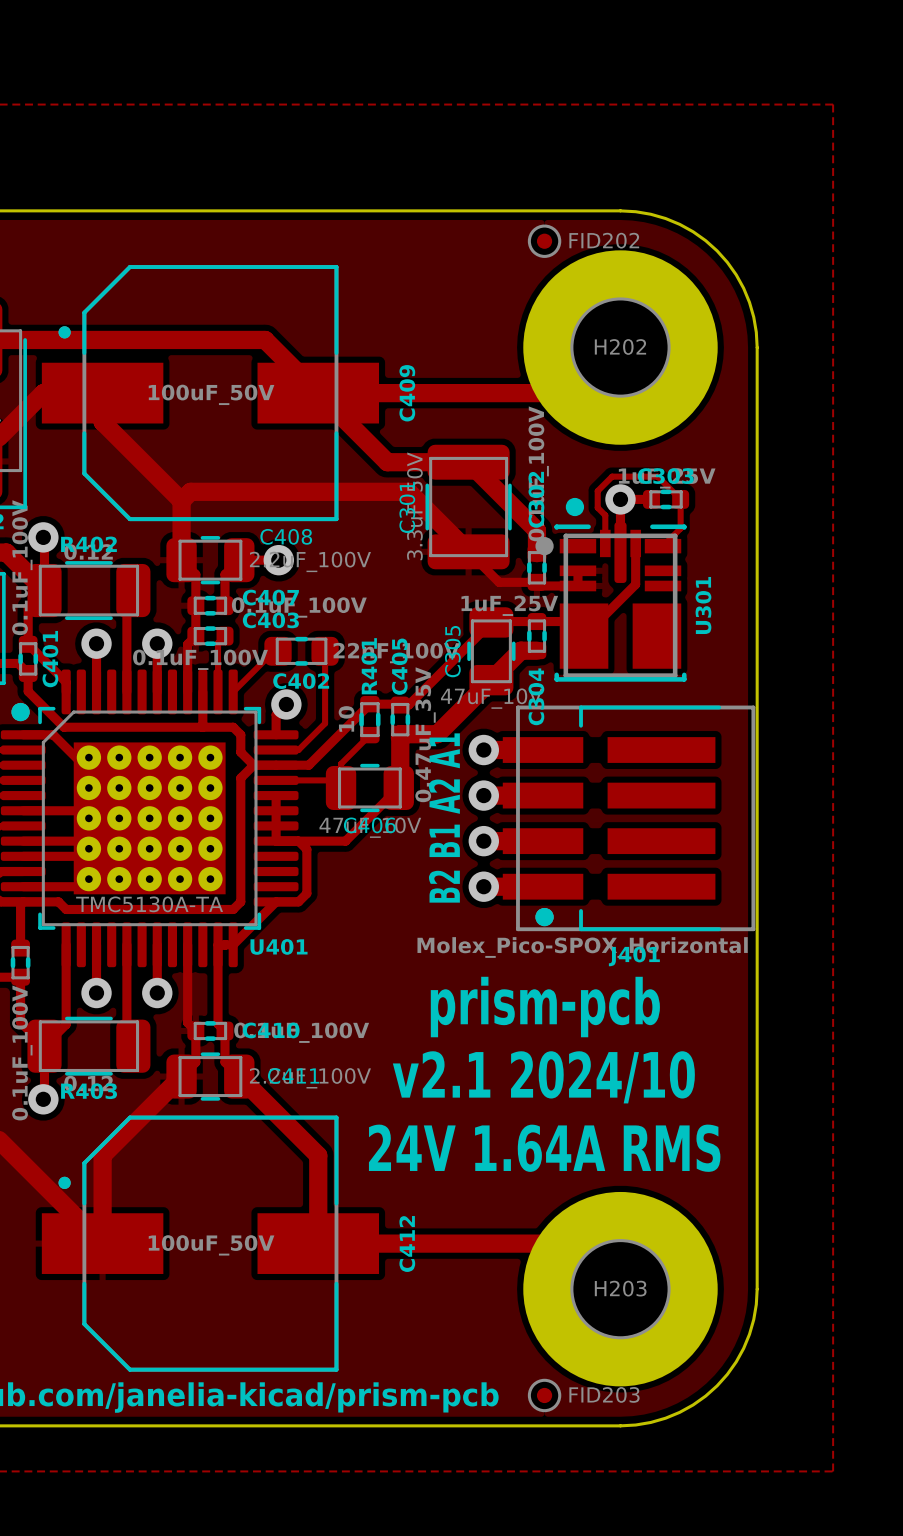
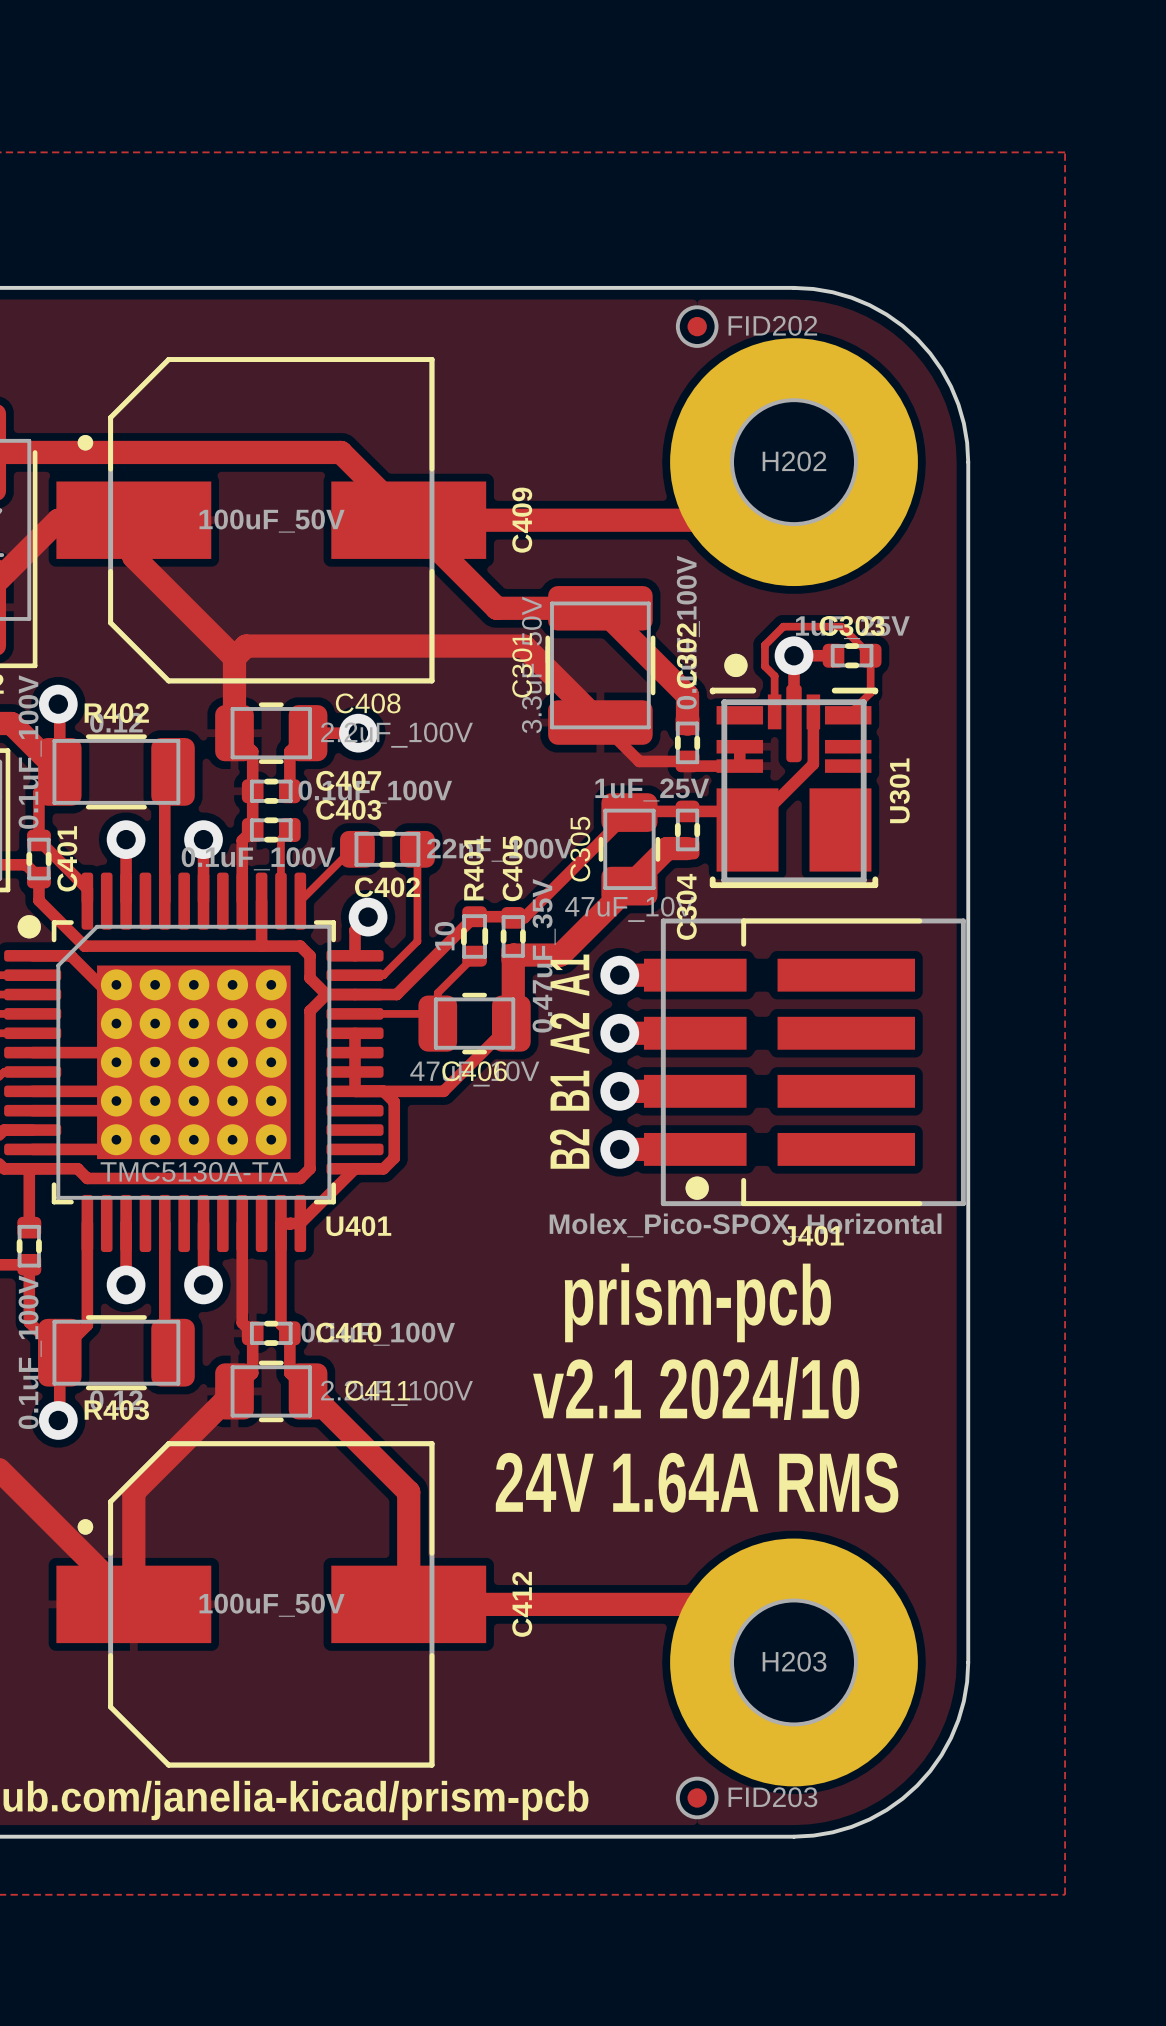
U301 footprint: [535, 497, 687, 682] -> [709, 653, 879, 889]

